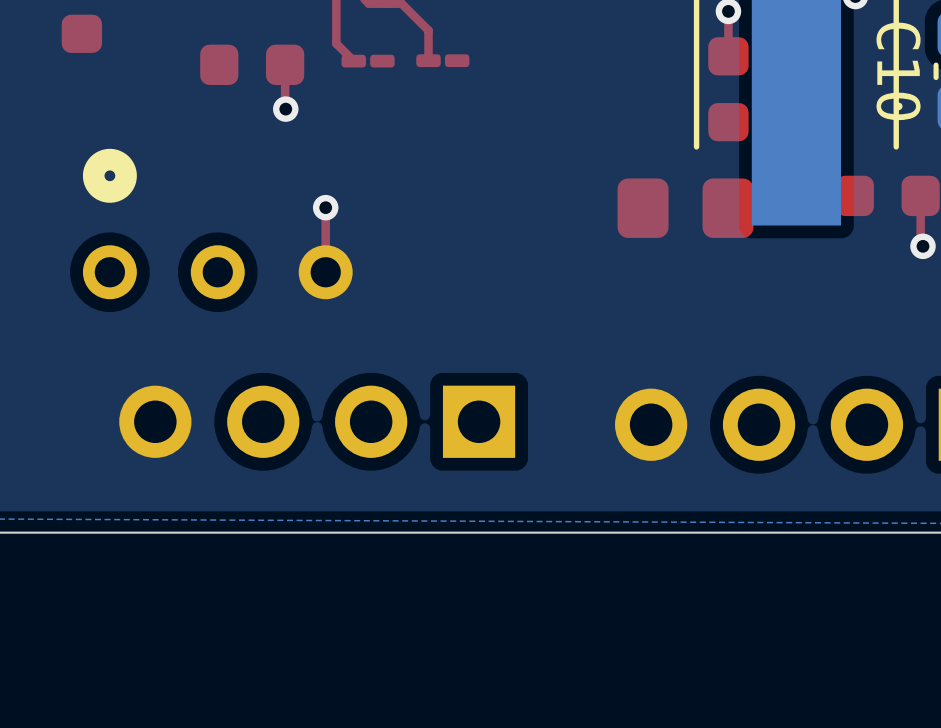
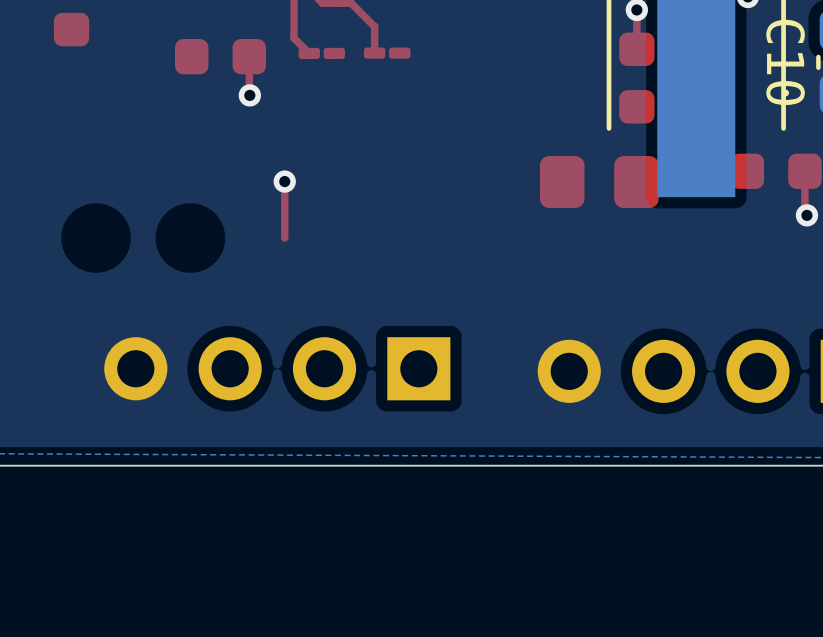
part: (217, 224) -> none

